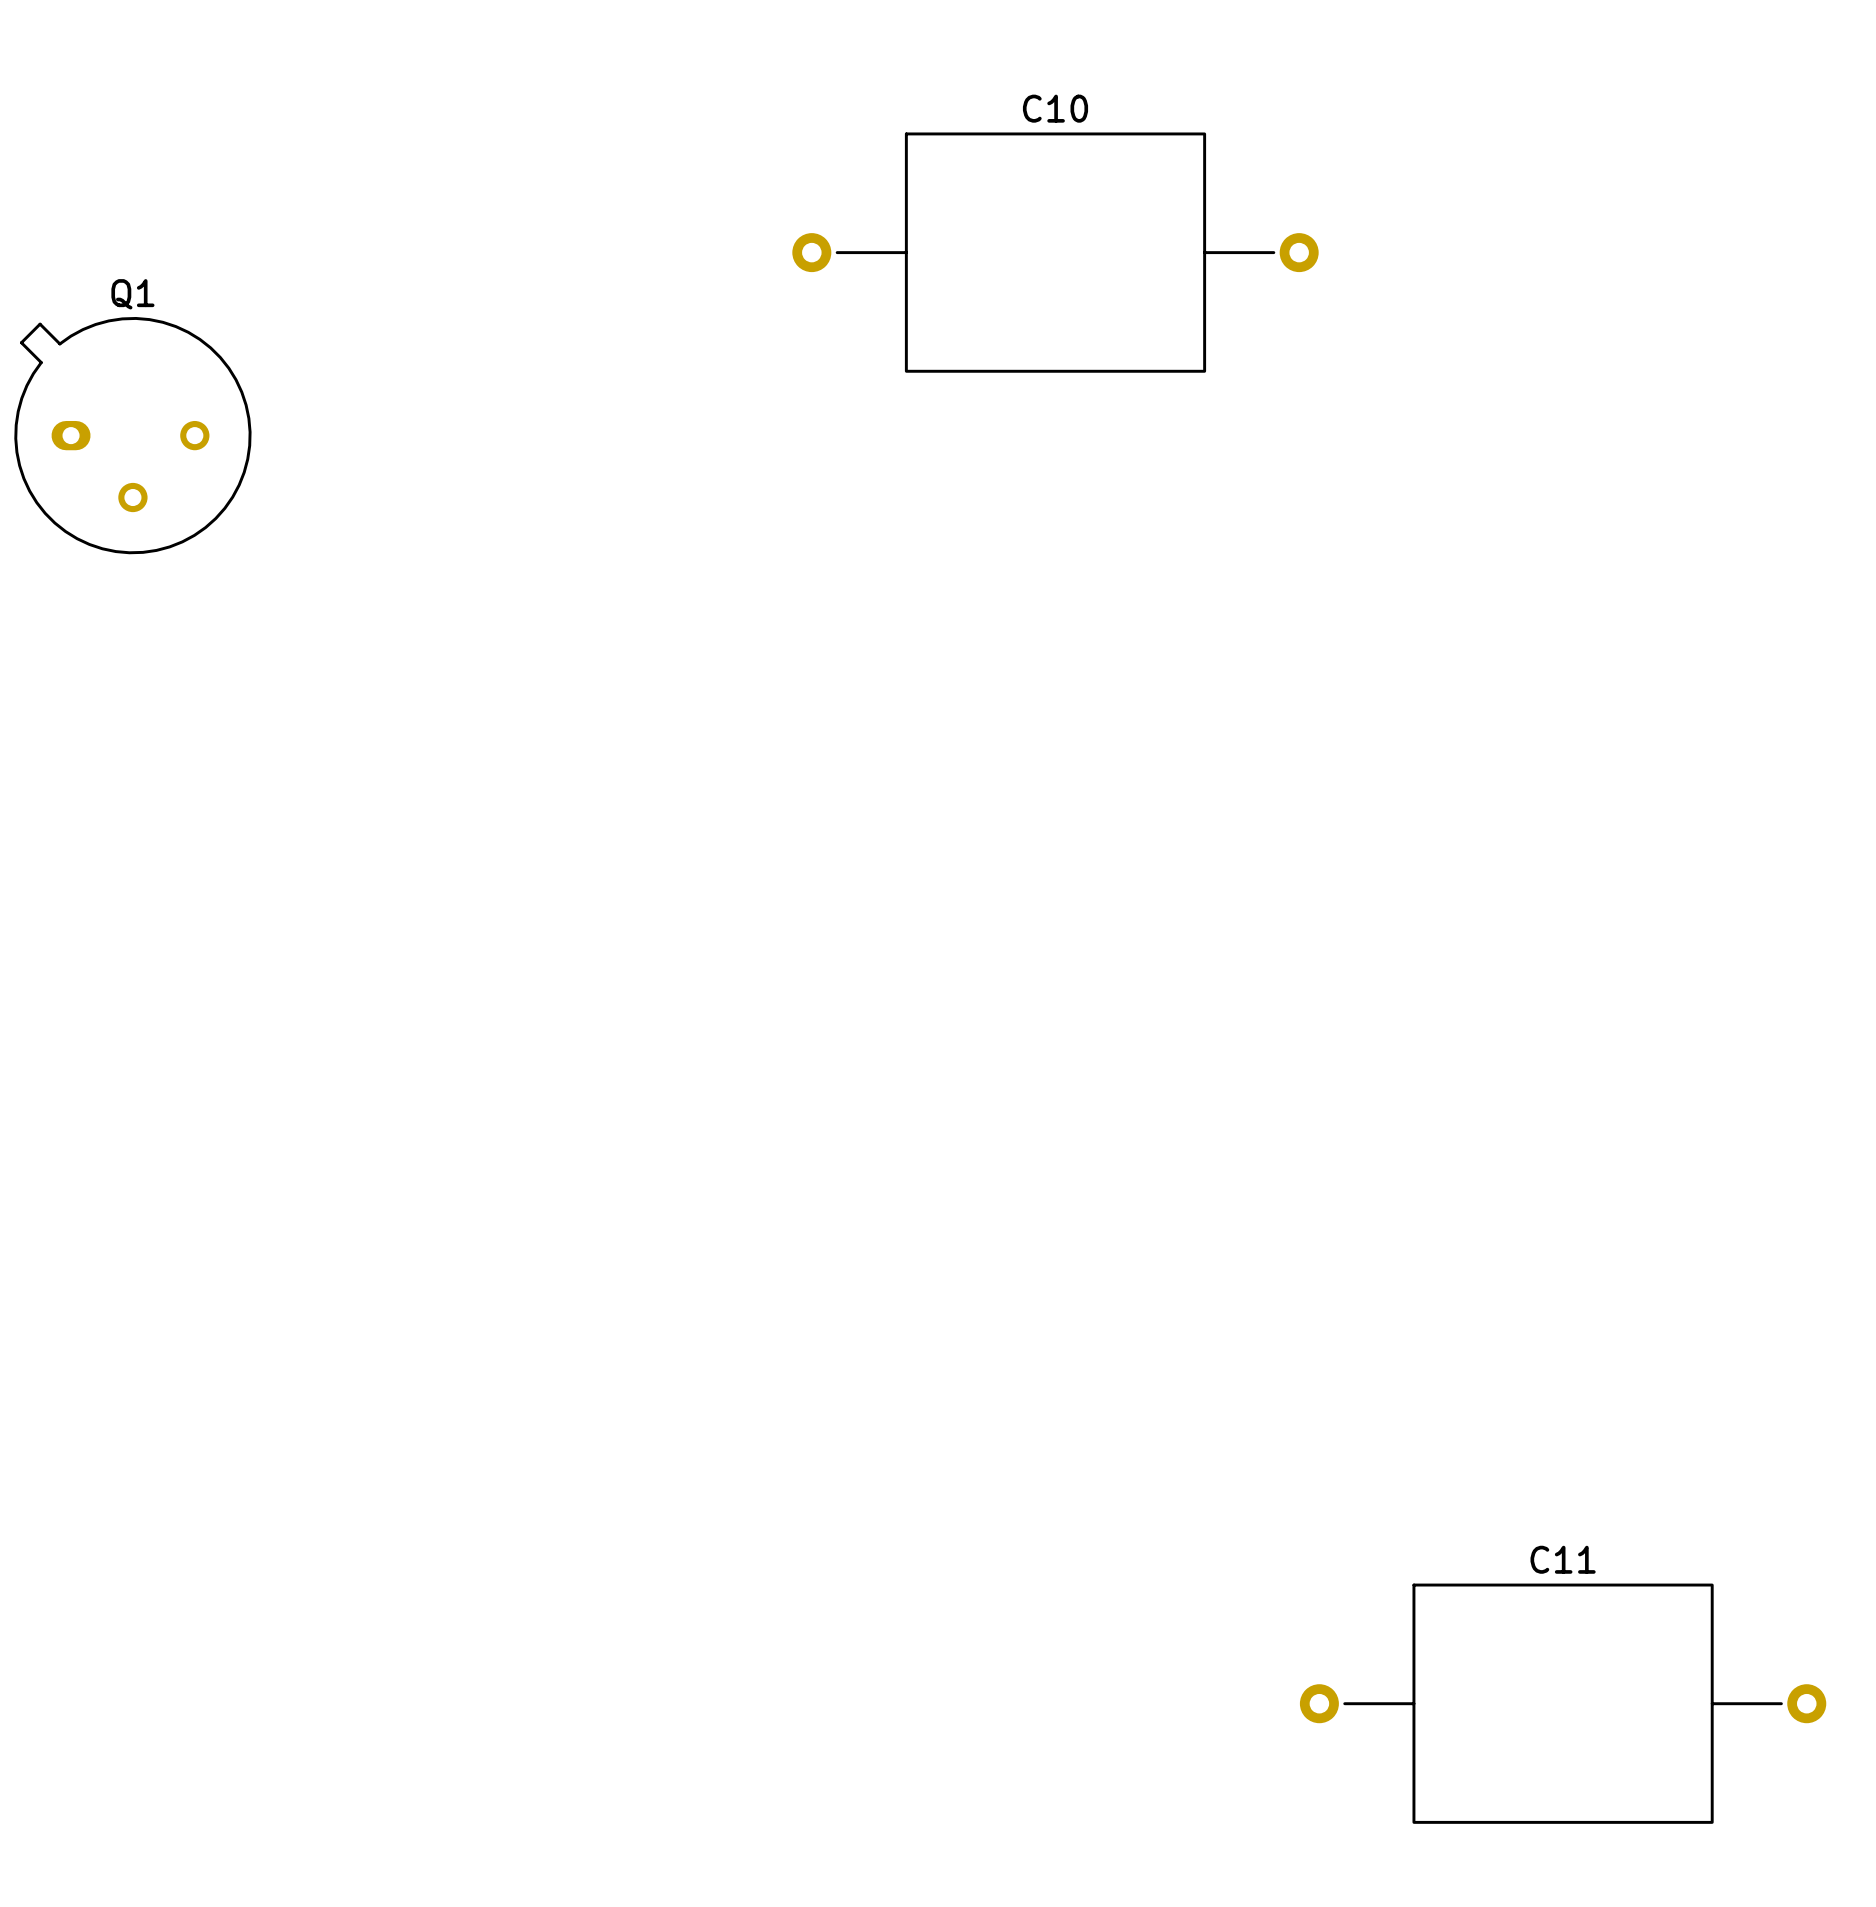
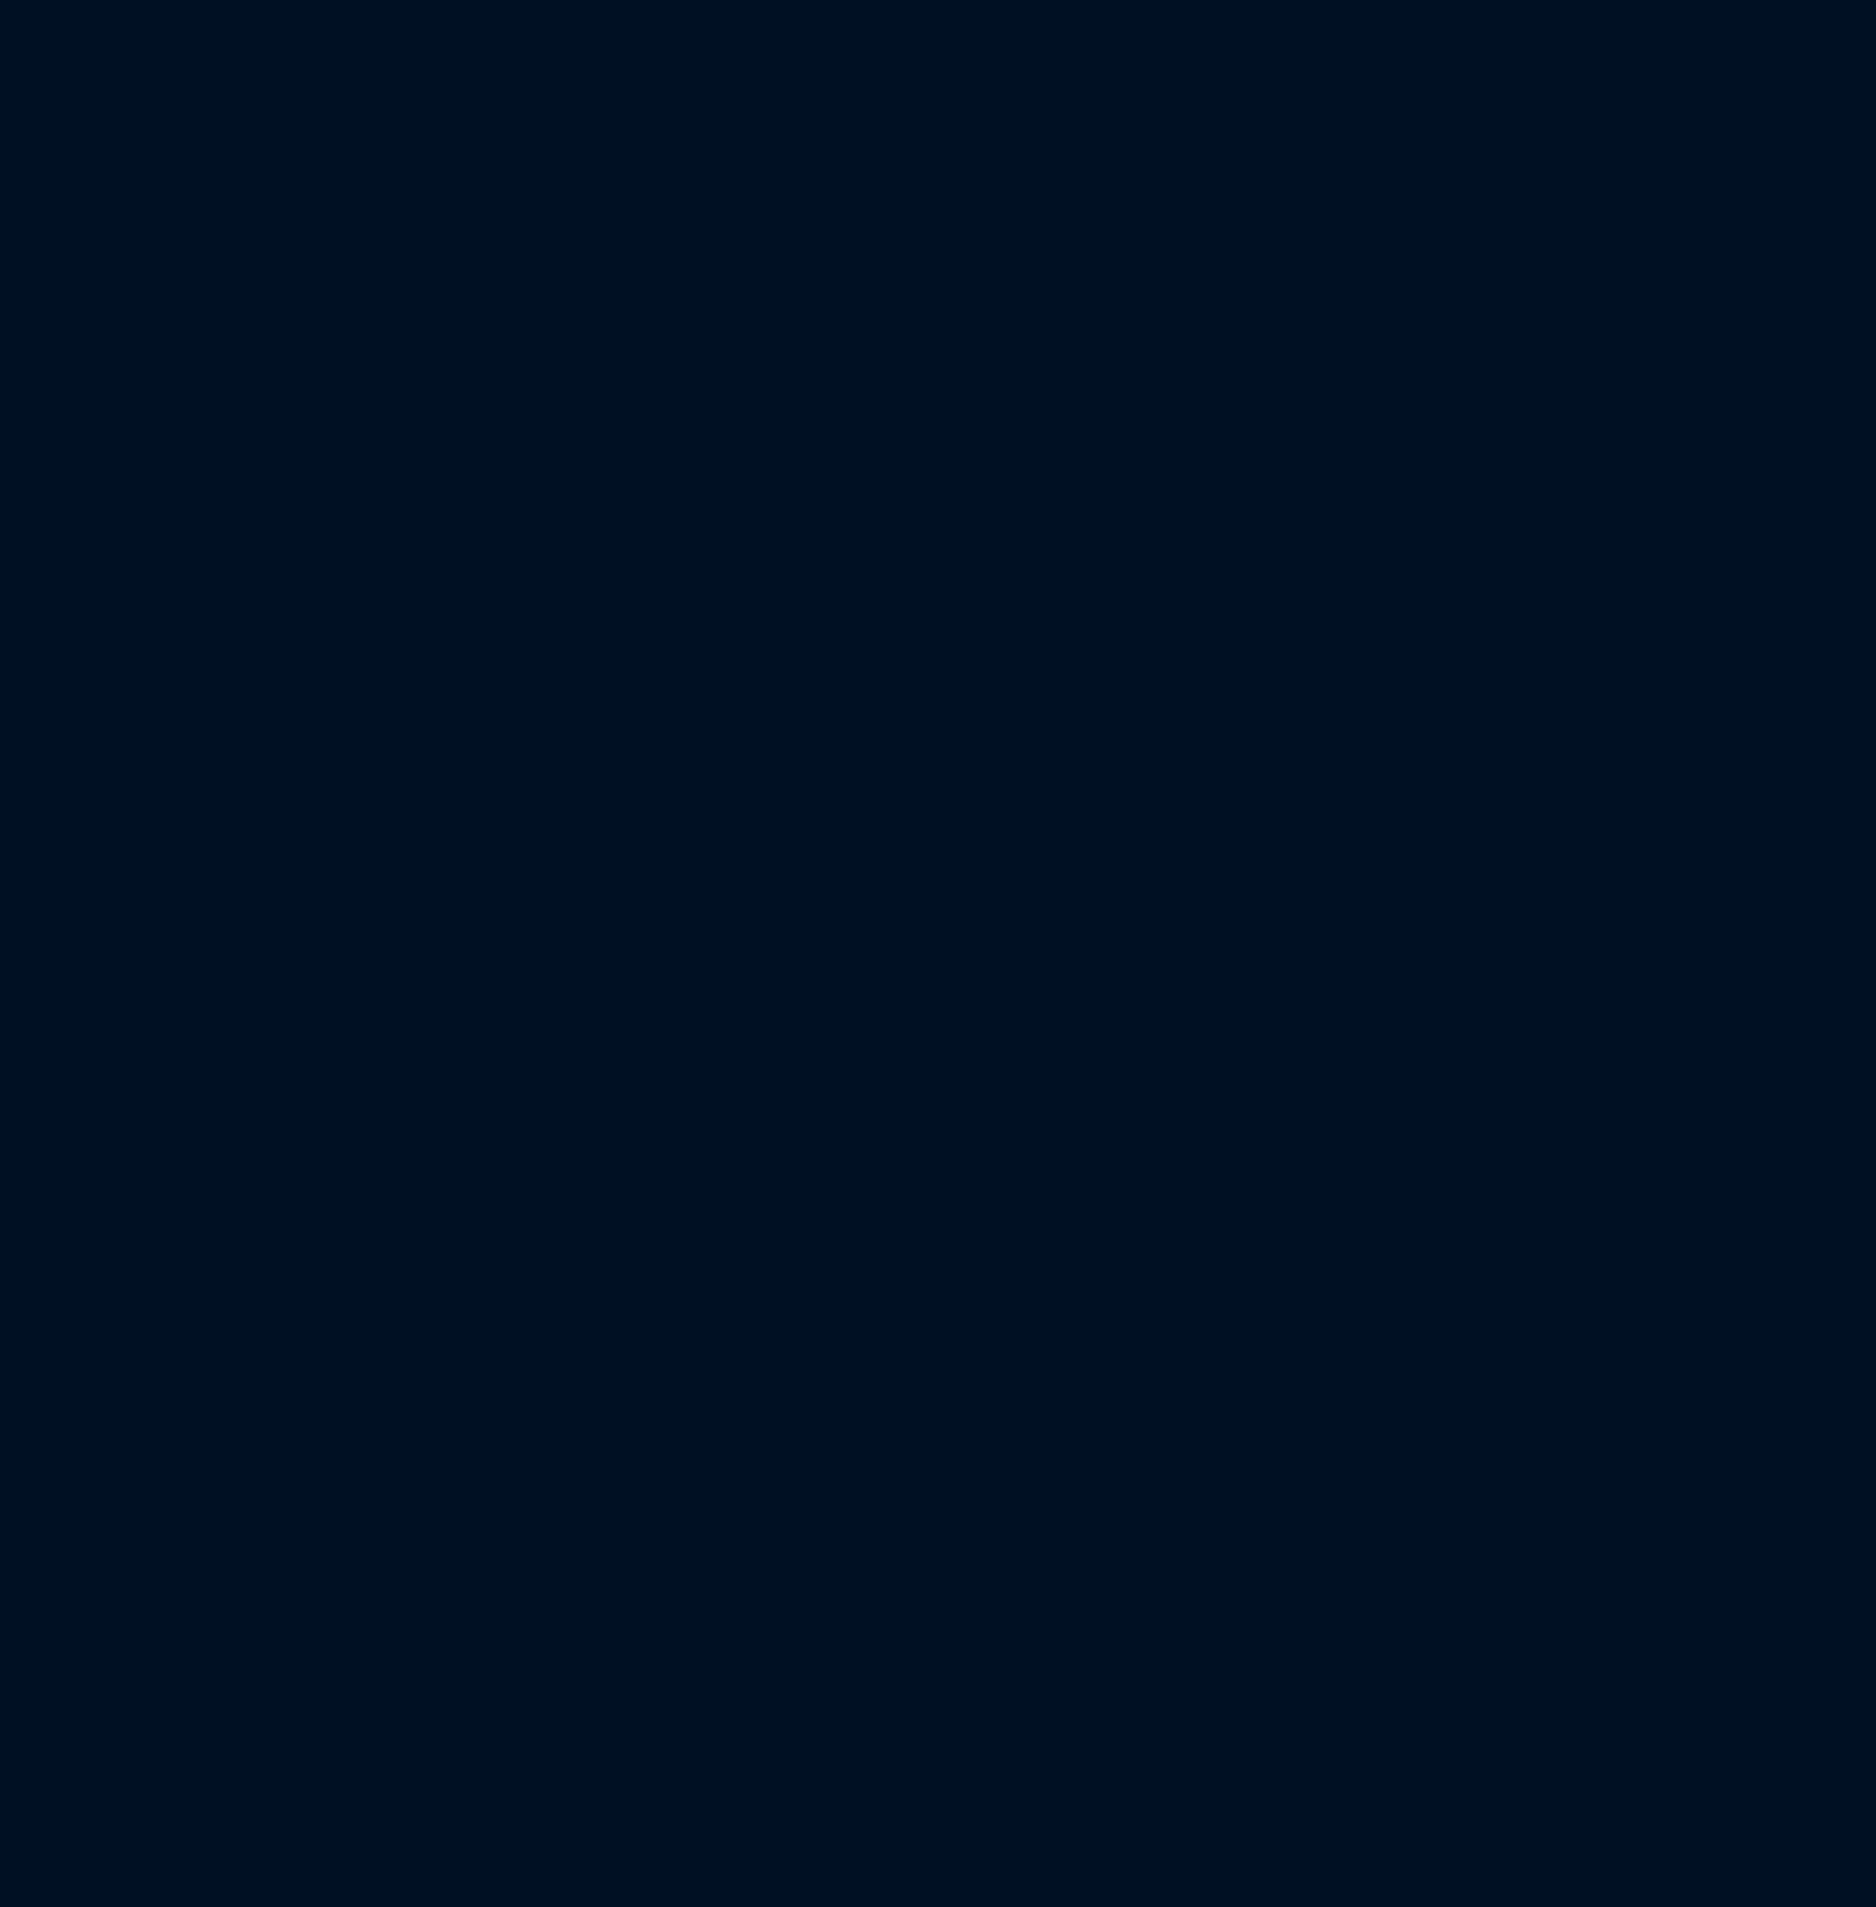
C10: (1055, 252) -> none
Q1: (132, 435) -> none
C11: (1563, 1703) -> none

